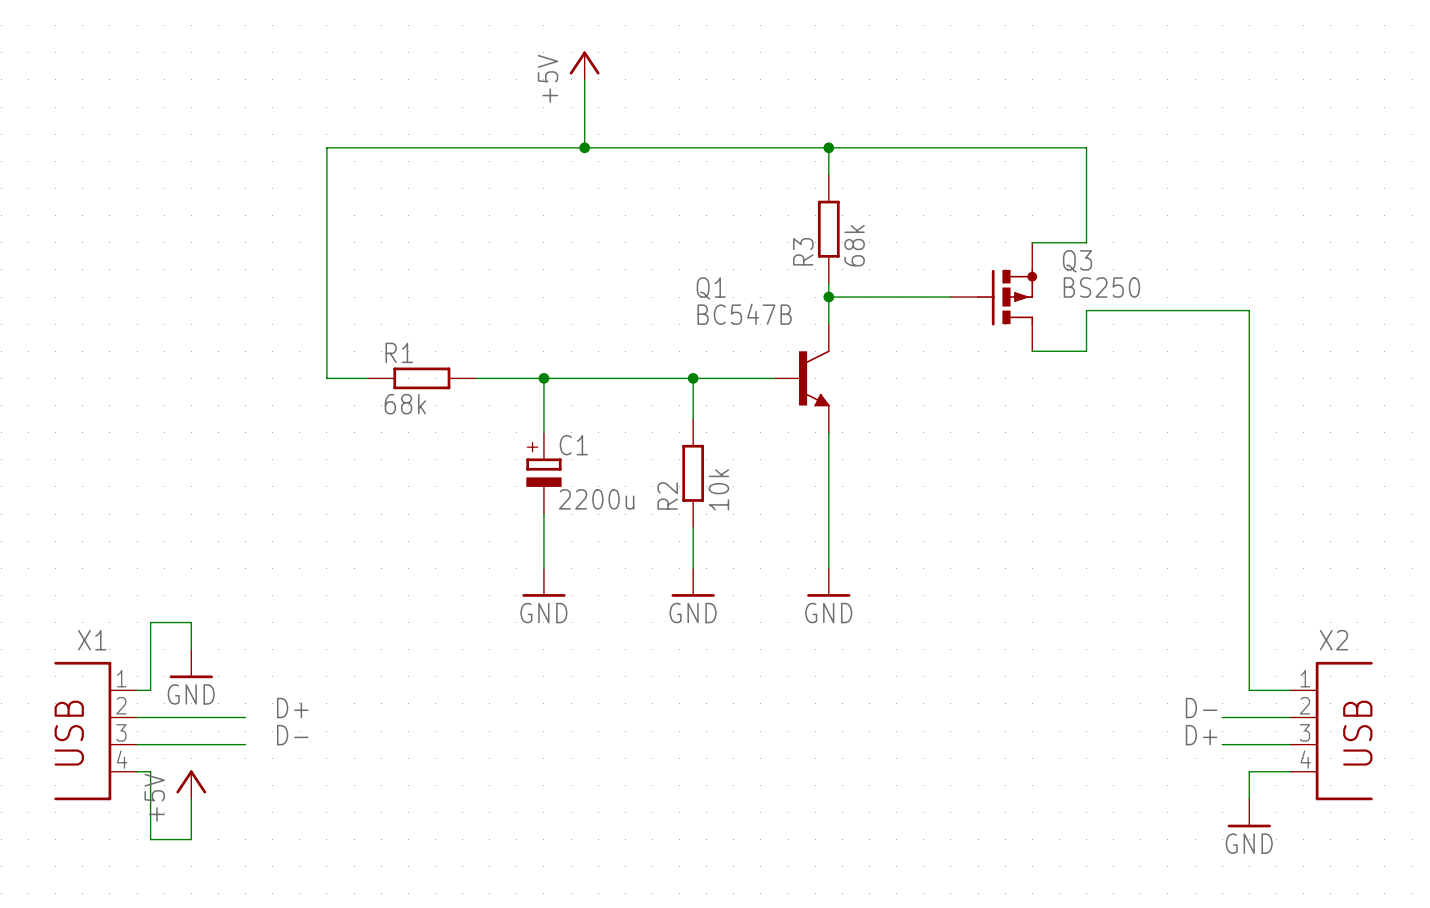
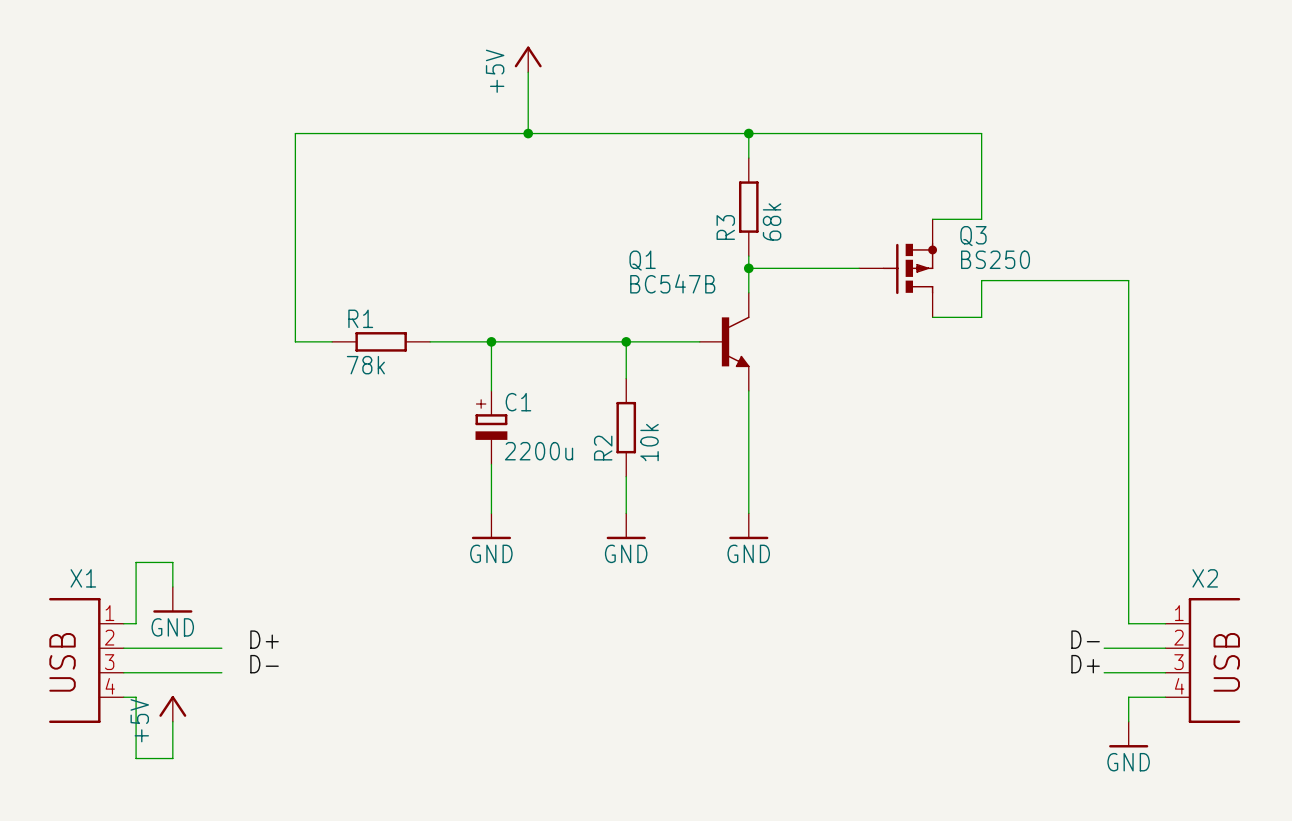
R1 value: 68k (405, 404) -> 78k (365, 365)

